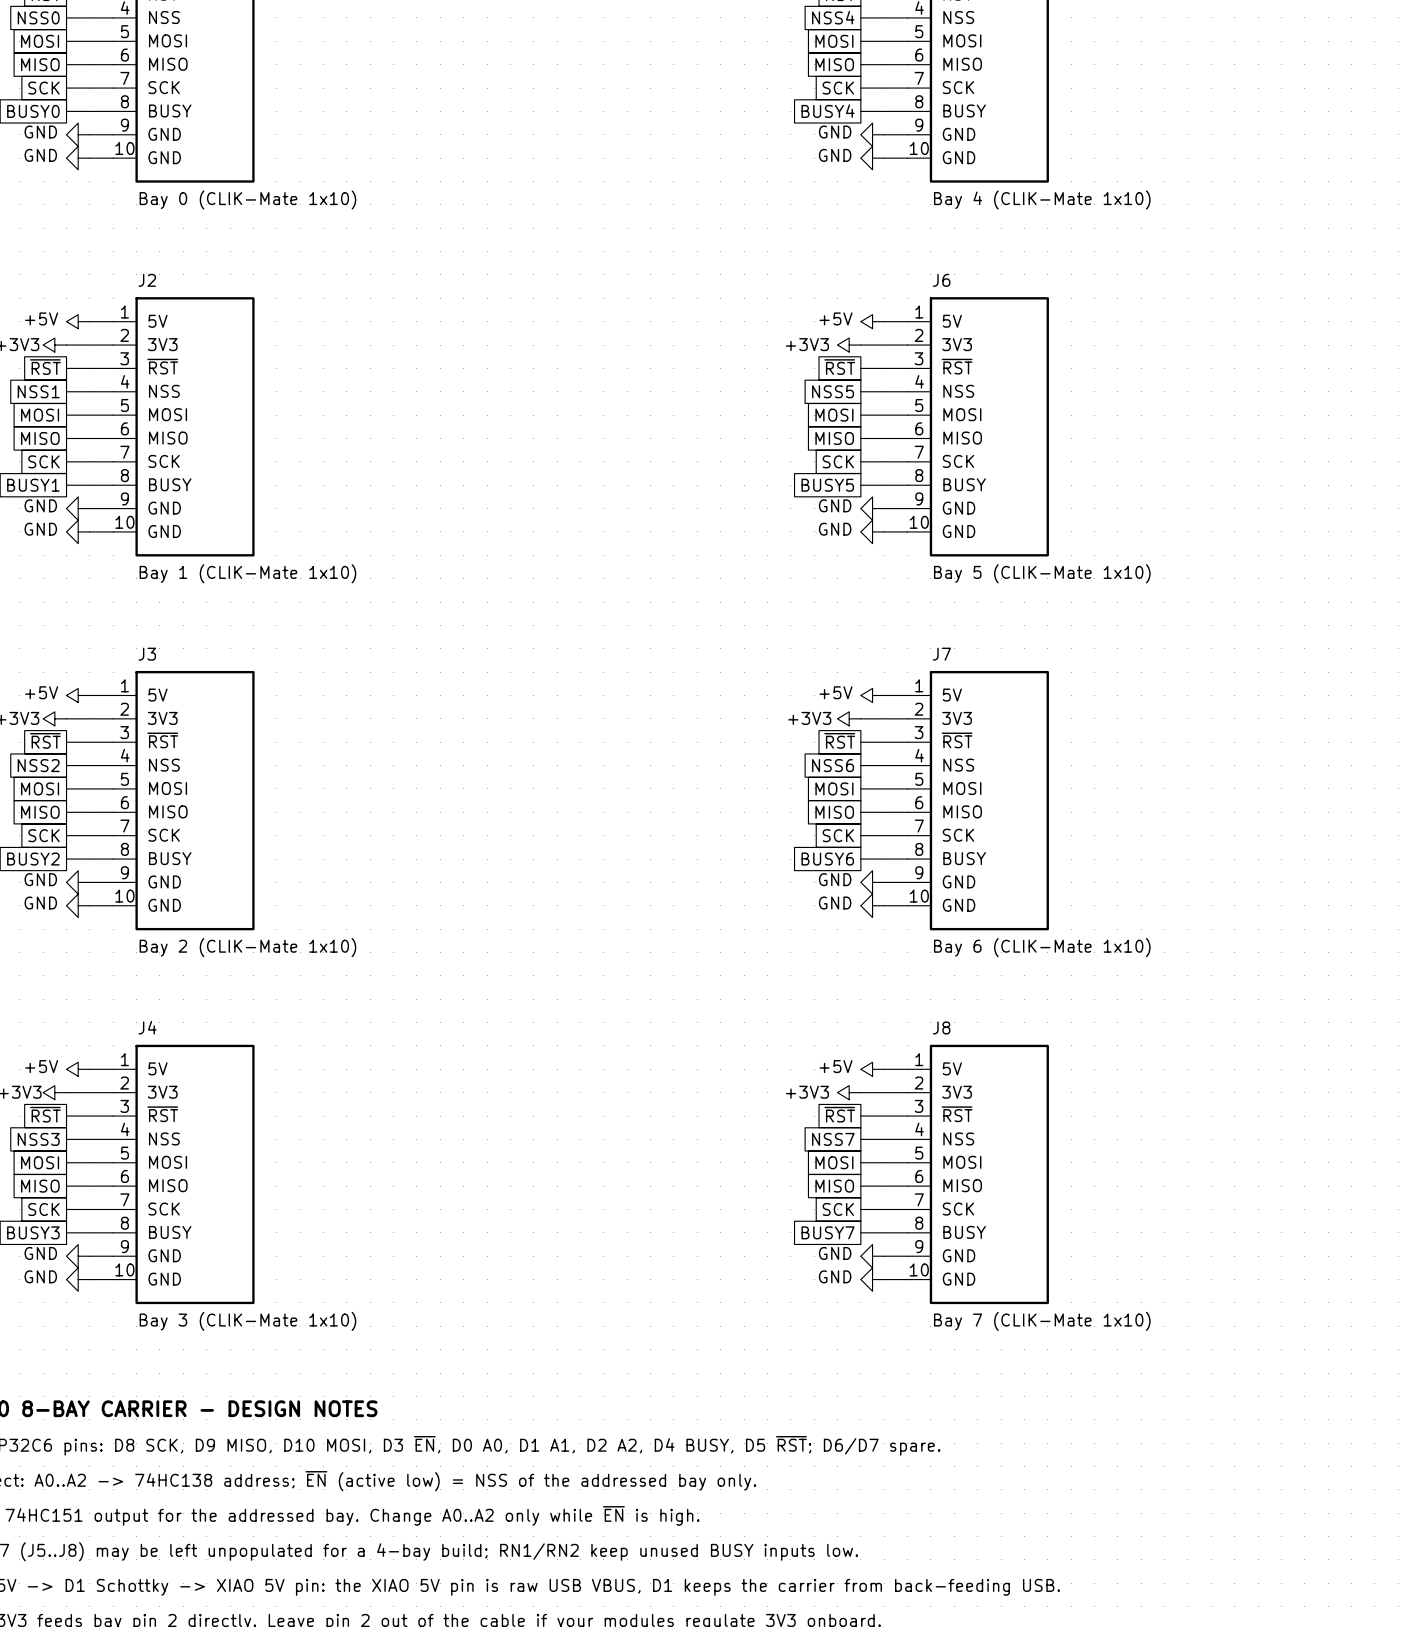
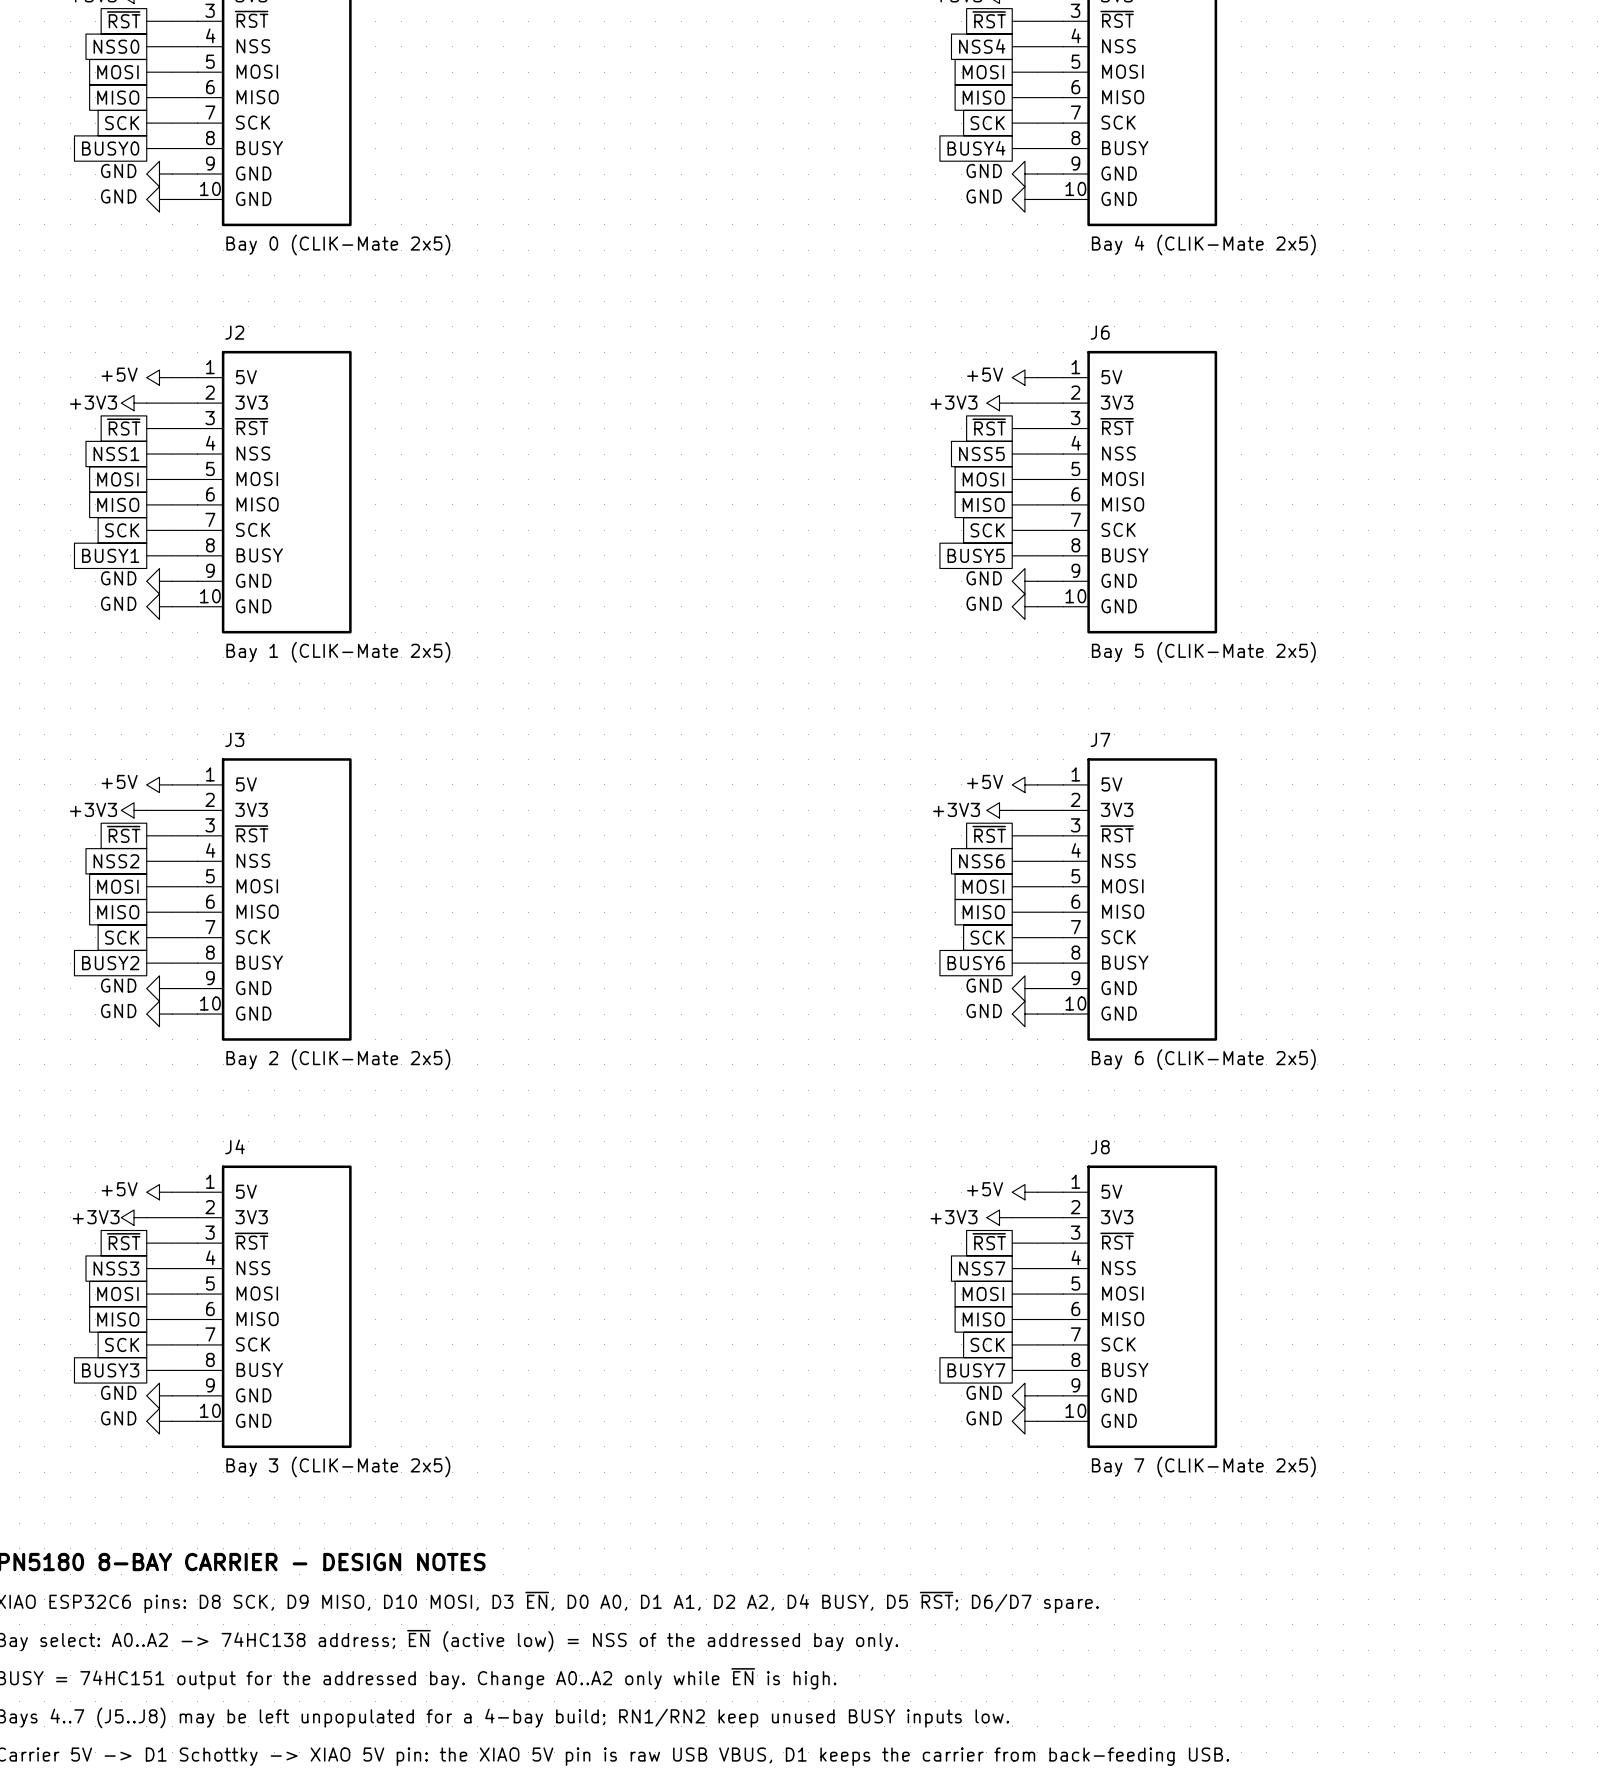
part value: Bay 0 (CLIK-Mate 1x10) (247, 199) -> Bay 0 (CLIK-Mate 2x5) (338, 245)
part value: Bay 4 (CLIK-Mate 1x10) (1042, 199) -> Bay 4 (CLIK-Mate 2x5) (1203, 245)
J2 value: Bay 1 (CLIK-Mate 1x10) (247, 573) -> Bay 1 (CLIK-Mate 2x5) (338, 652)
J6 value: Bay 5 (CLIK-Mate 1x10) (1042, 573) -> Bay 5 (CLIK-Mate 2x5) (1203, 652)
J3 value: Bay 2 (CLIK-Mate 1x10) (247, 947) -> Bay 2 (CLIK-Mate 2x5) (338, 1059)
J7 value: Bay 6 (CLIK-Mate 1x10) (1042, 947) -> Bay 6 (CLIK-Mate 2x5) (1203, 1059)
J4 value: Bay 3 (CLIK-Mate 1x10) (247, 1321) -> Bay 3 (CLIK-Mate 2x5) (338, 1466)
J8 value: Bay 7 (CLIK-Mate 1x10) (1042, 1321) -> Bay 7 (CLIK-Mate 2x5) (1203, 1466)

